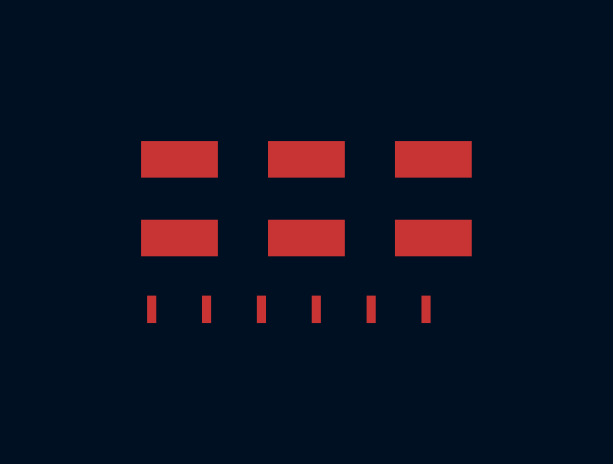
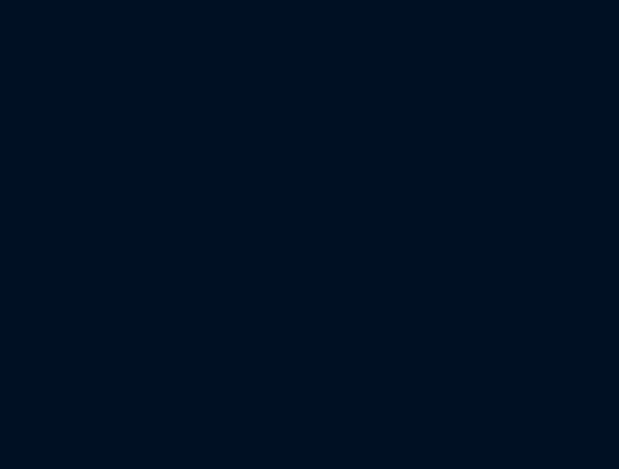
part: (179, 159) -> none
part: (306, 159) -> none
part: (433, 159) -> none
part: (179, 238) -> none
part: (306, 238) -> none
part: (433, 238) -> none
part: (151, 309) -> none
part: (206, 309) -> none
part: (261, 309) -> none
part: (316, 309) -> none
part: (371, 309) -> none
part: (426, 309) -> none

